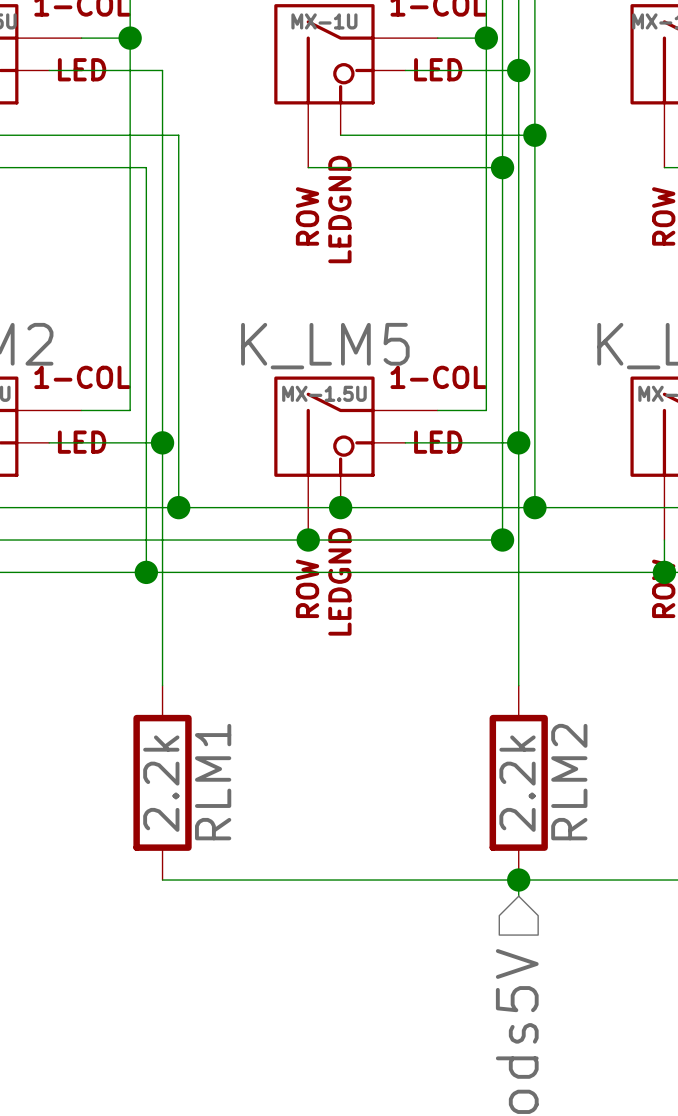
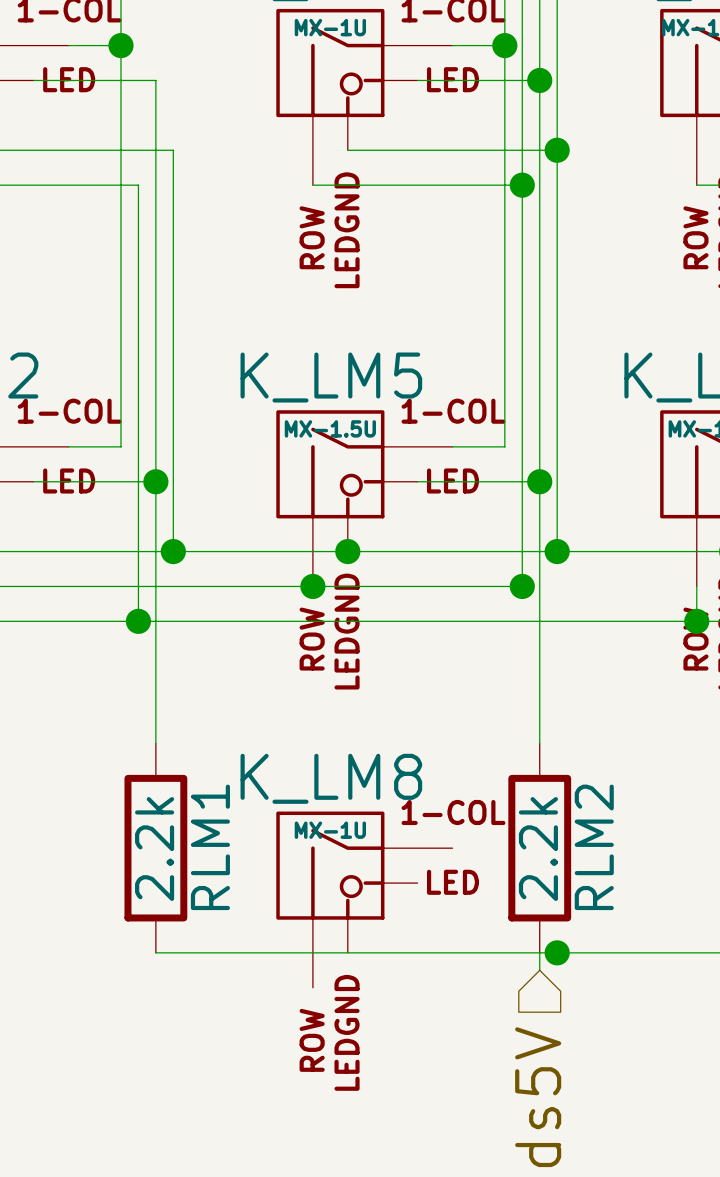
K_LM8: none -> MX-1U (364, 899)
junction position: (518, 880) -> (557, 952)

